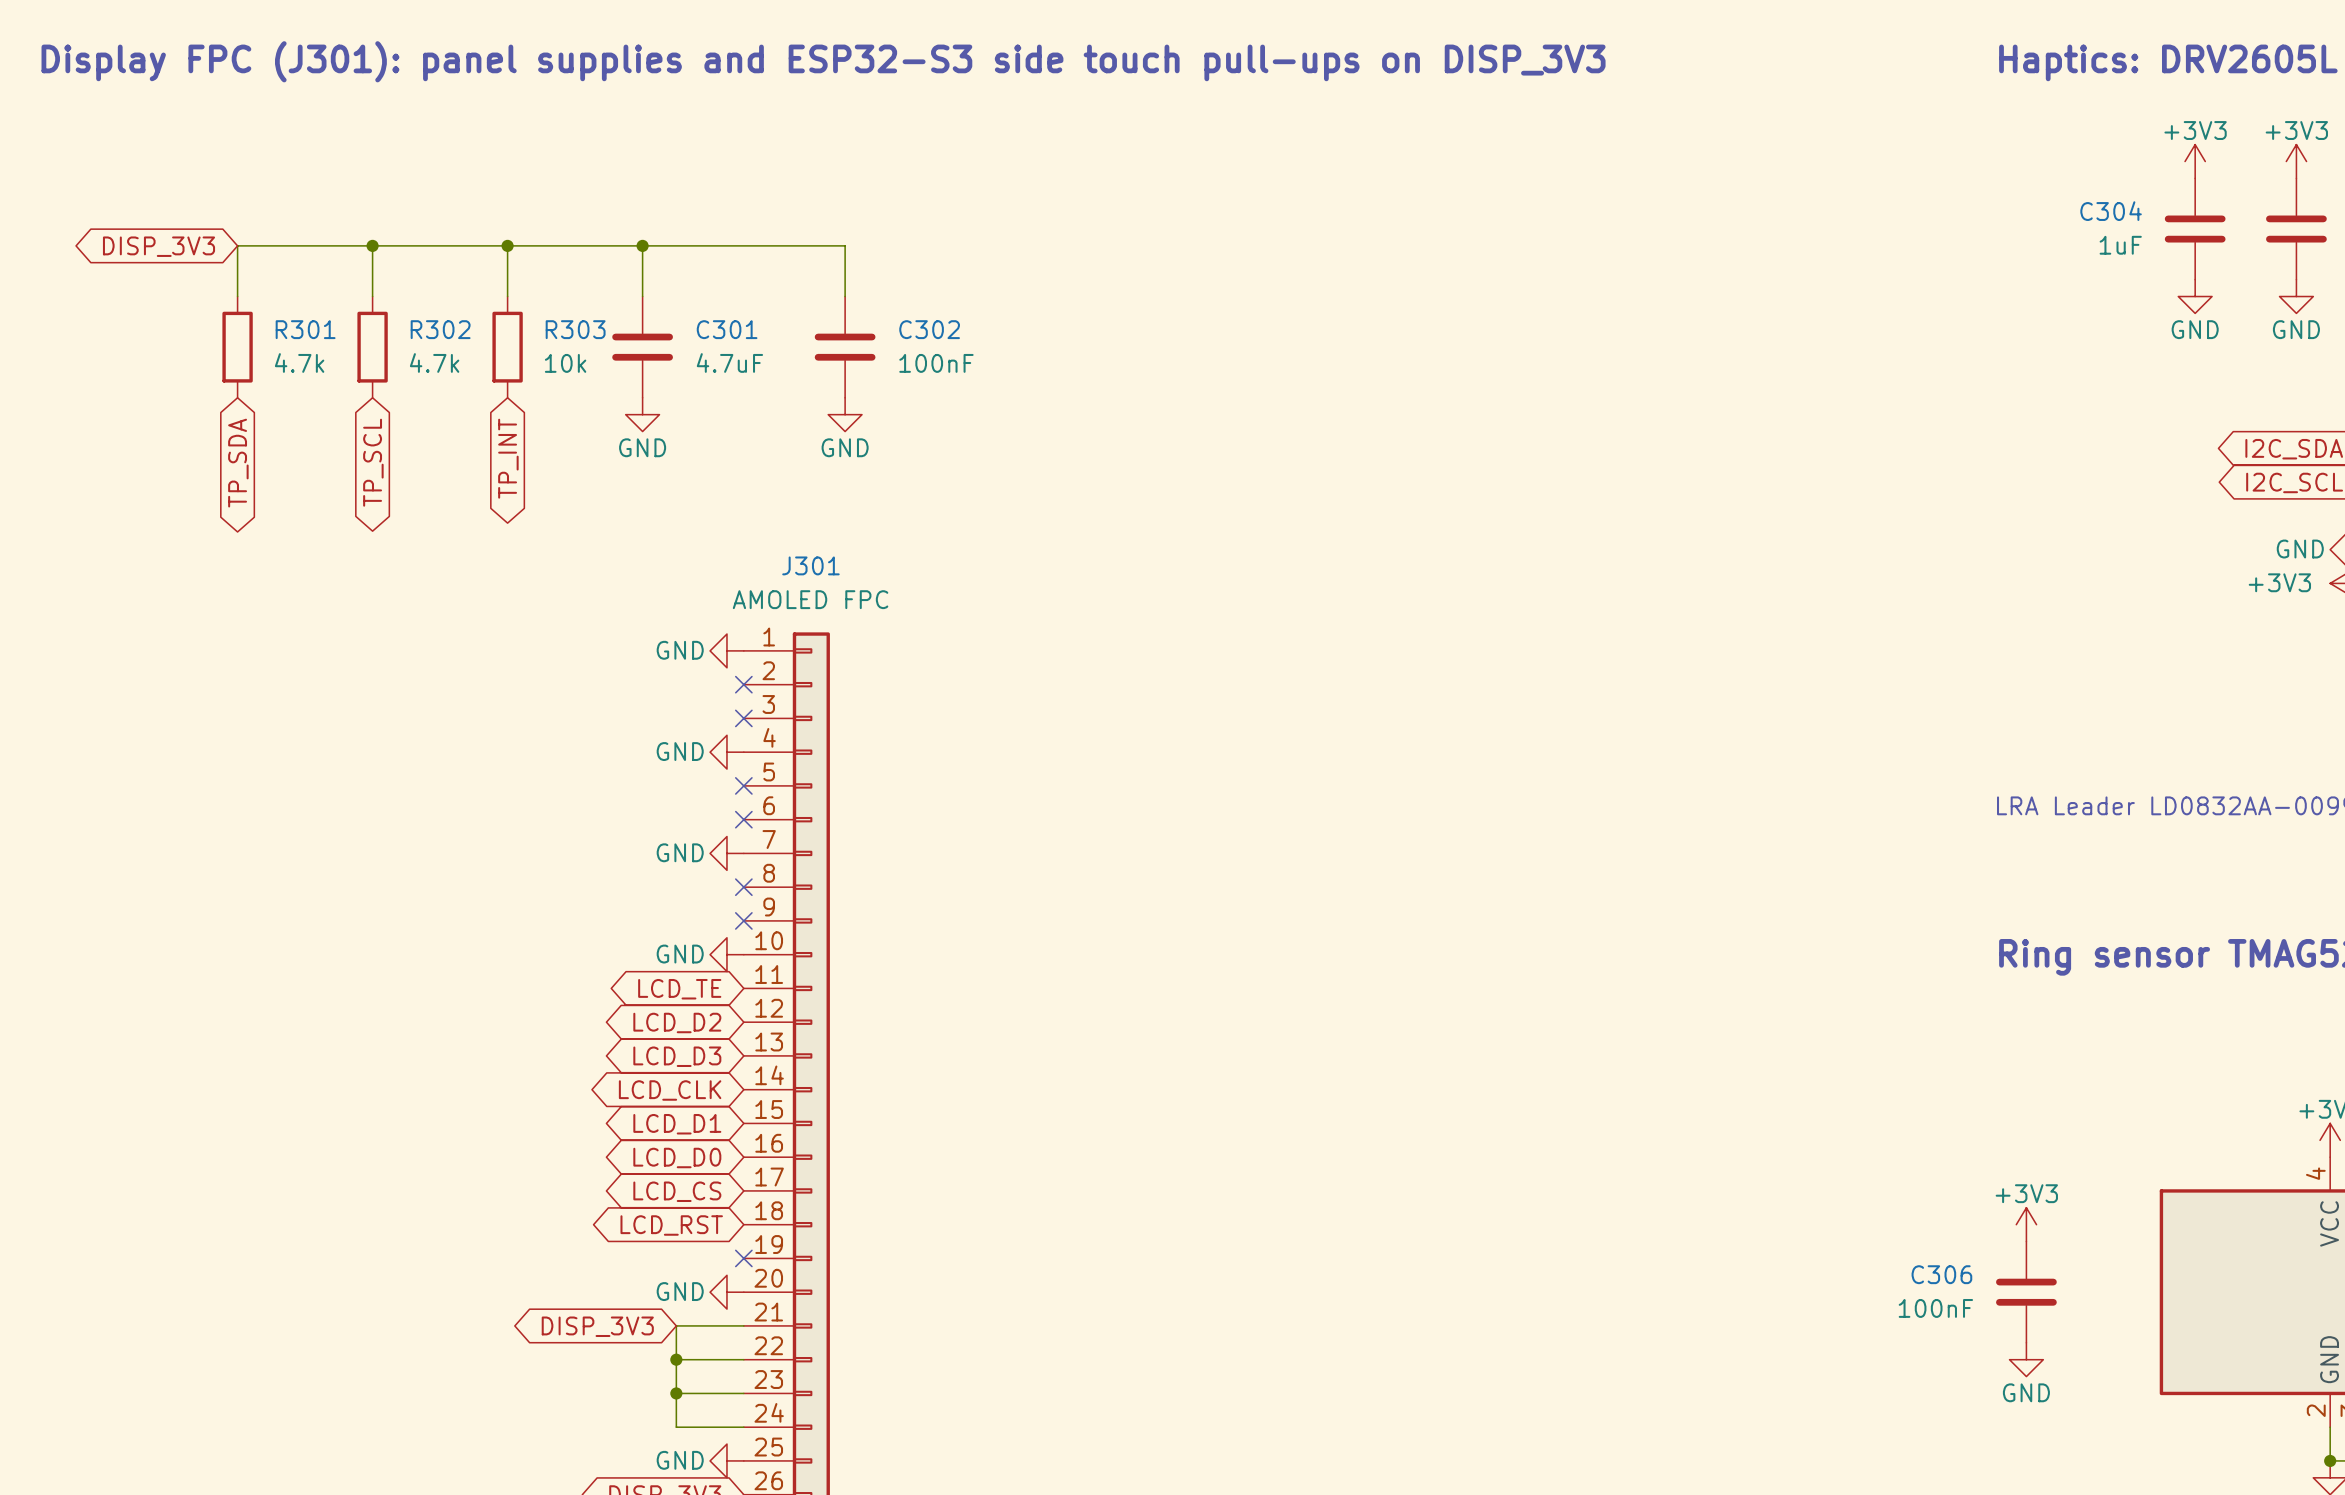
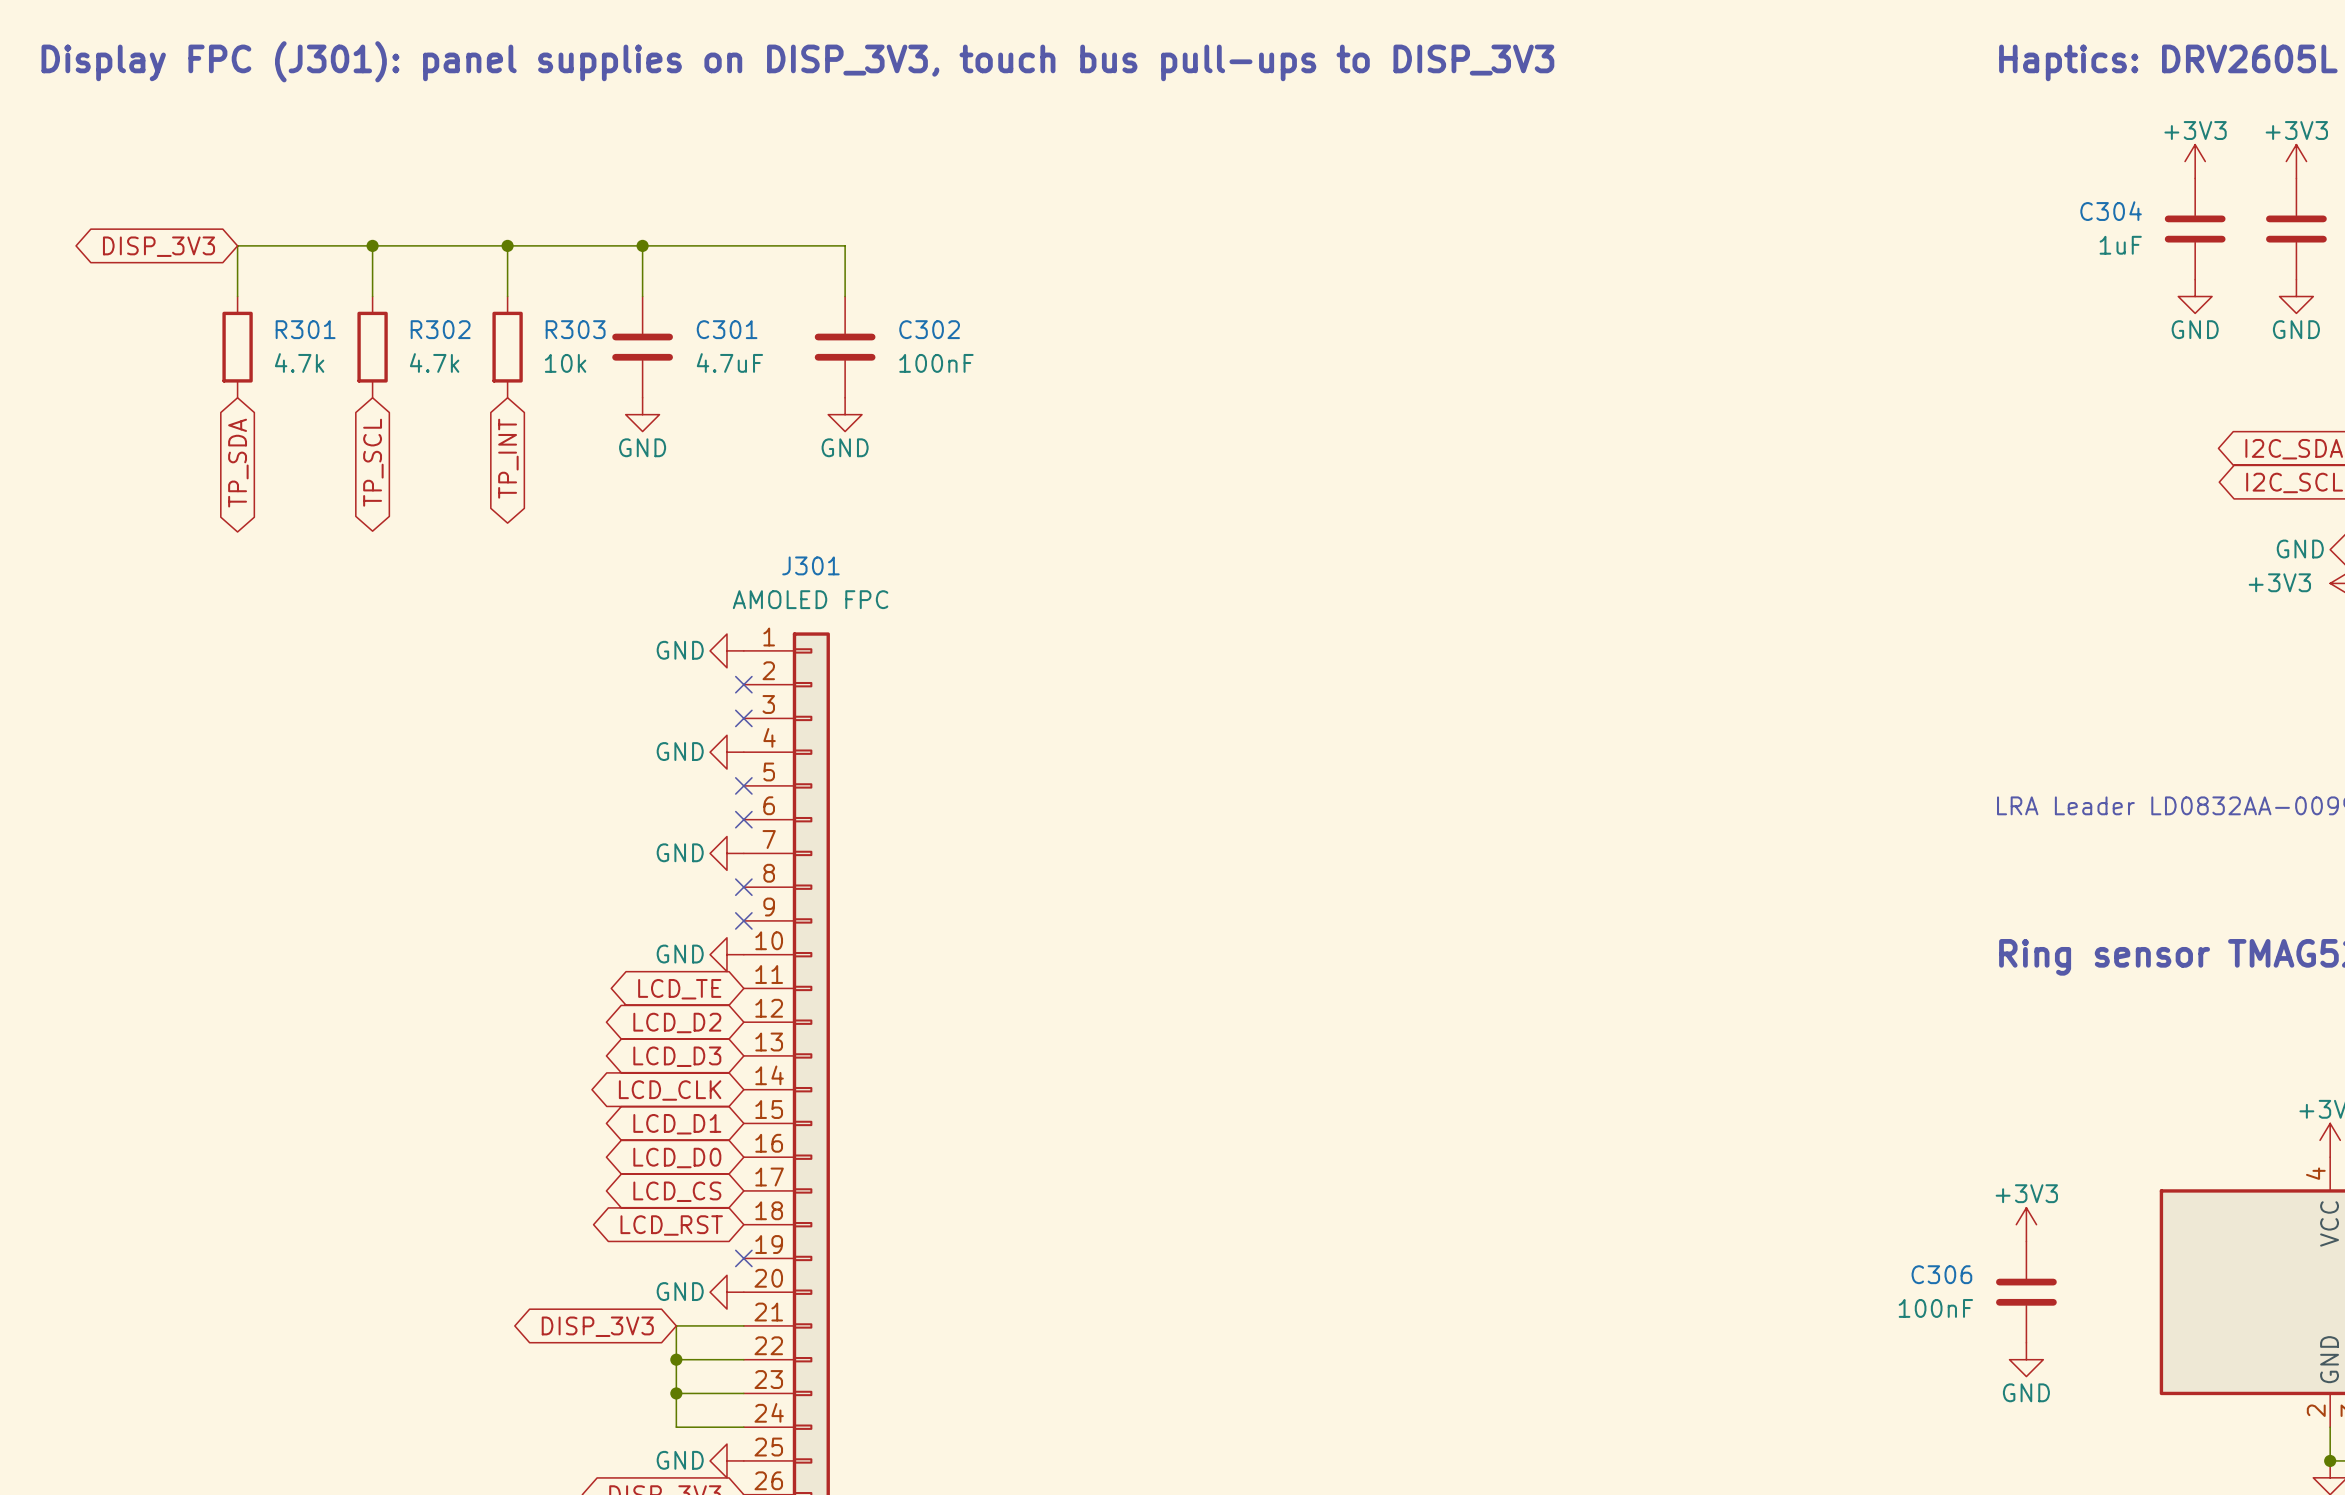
text: Display FPC (J301): panel supplies and ESP32-S3 side touch pull-ups on DISP_3V3 (823, 61) -> Display FPC (J301): panel supplies on DISP_3V3, touch bus pull-ups to DISP_3V3 (797, 61)

